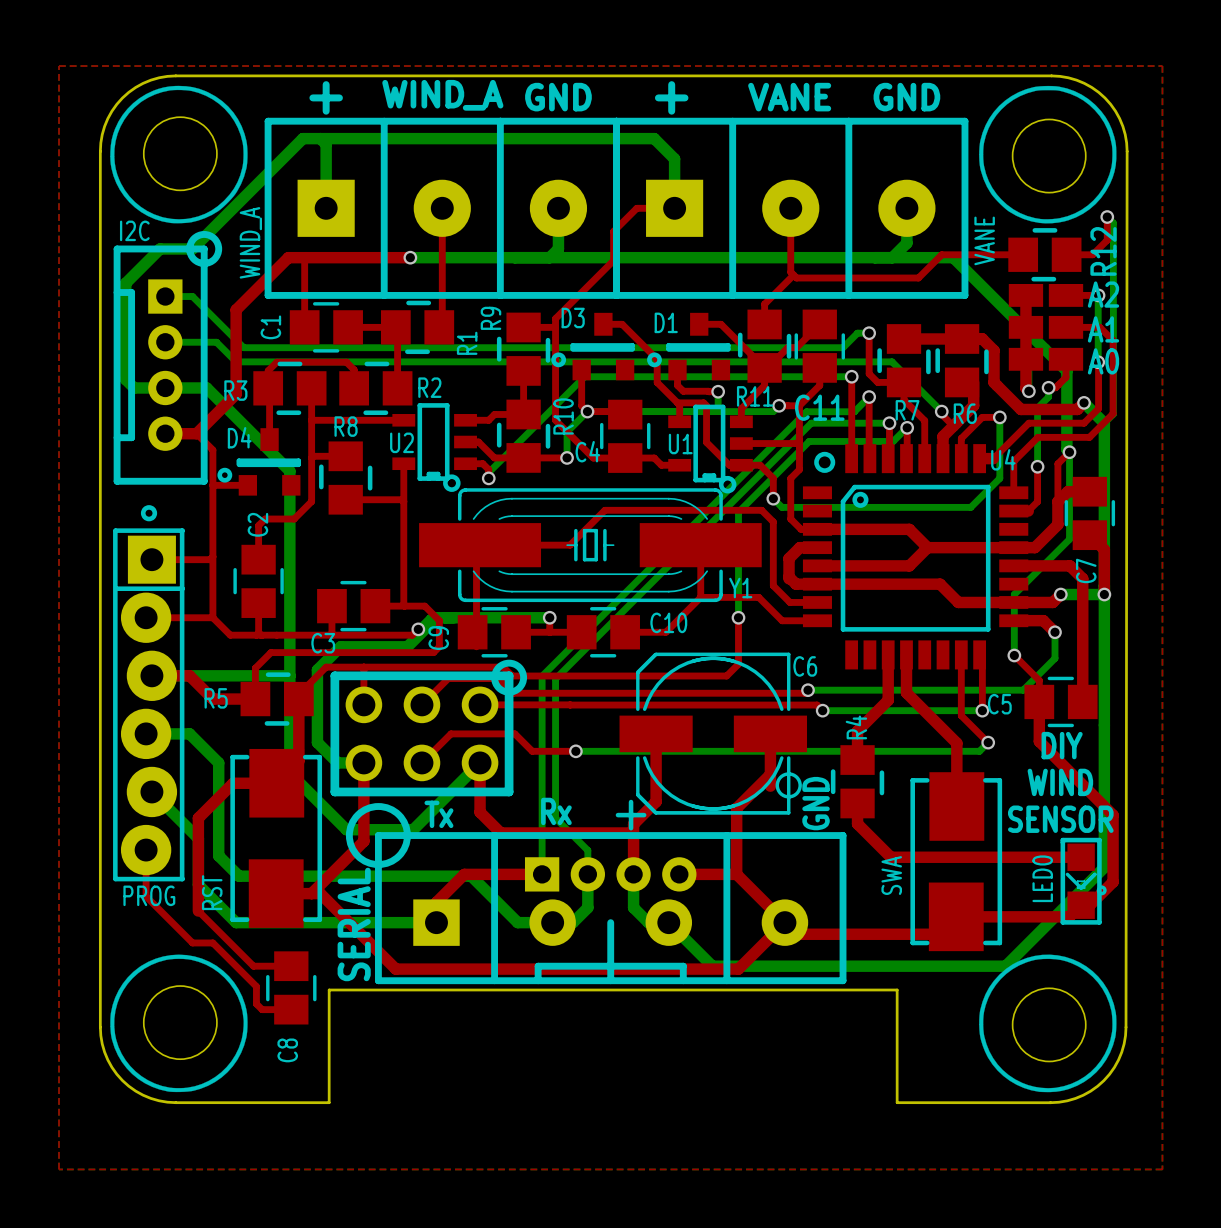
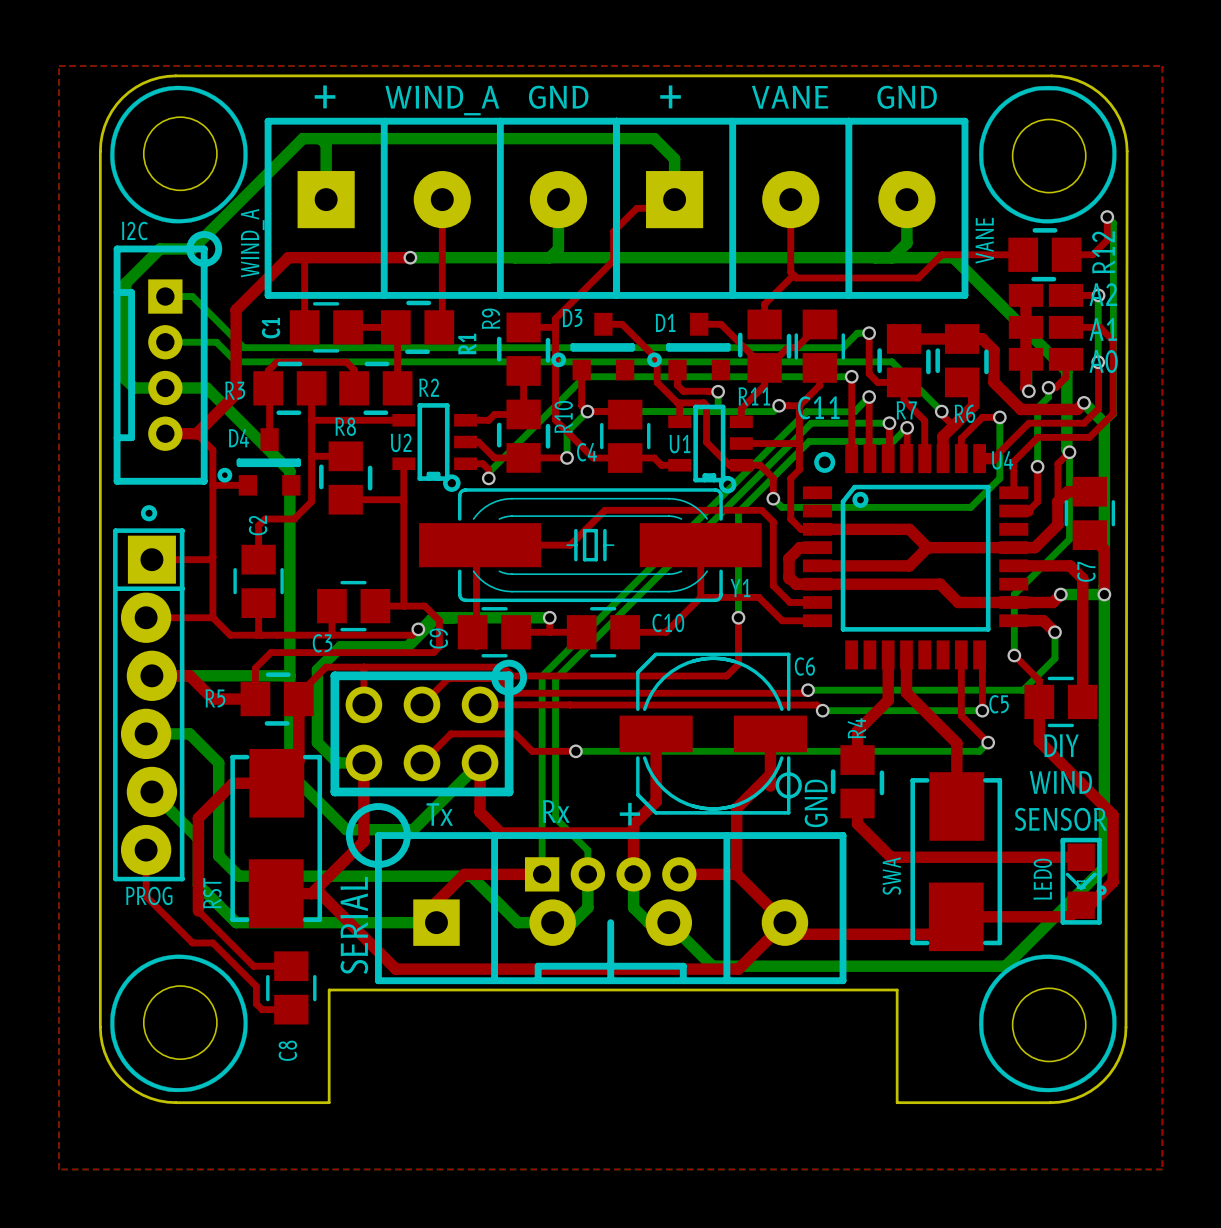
part footprint: [264, 117, 620, 299] -> [264, 117, 620, 299]
part footprint: [613, 117, 969, 299] -> [613, 117, 969, 299]

